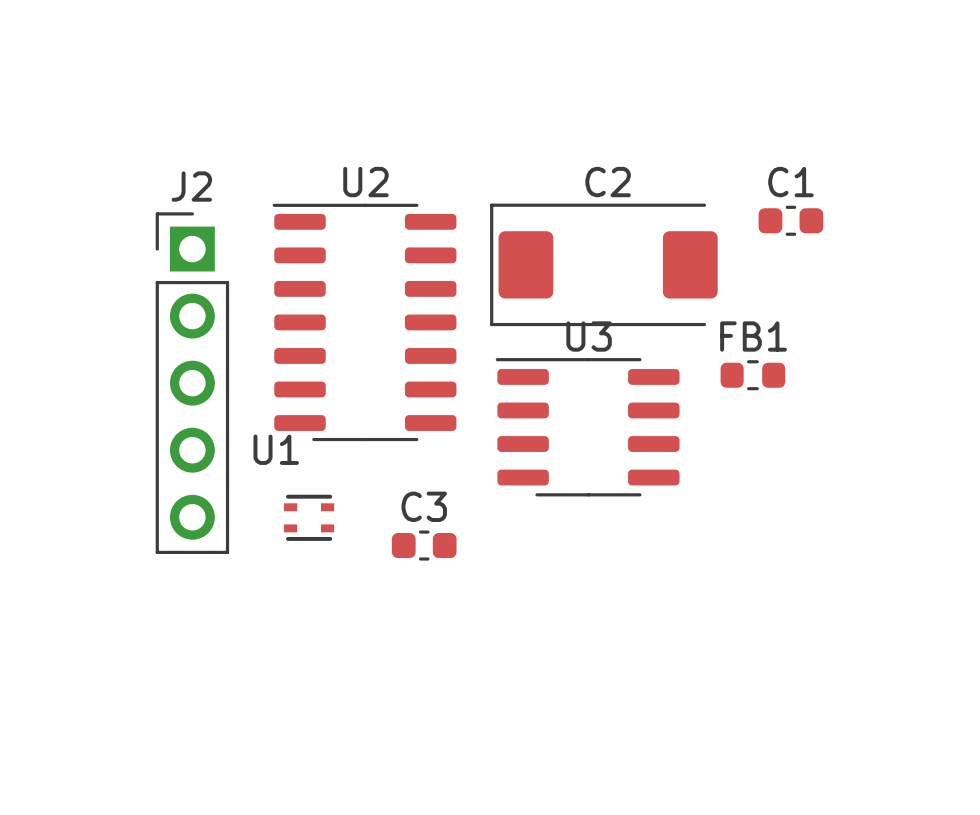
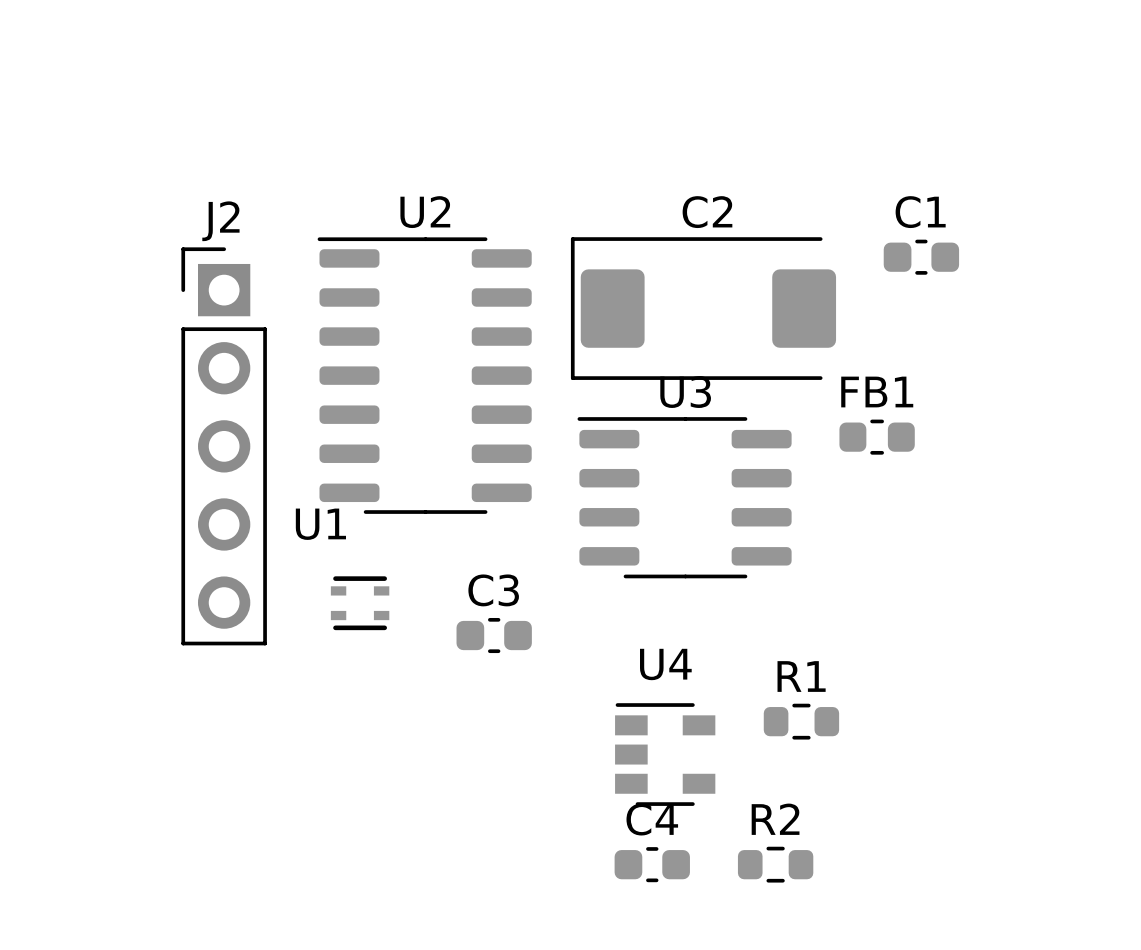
R1: none -> (801, 721)
U4: none -> (665, 754)
C4: none -> (652, 864)
R2: none -> (775, 864)

